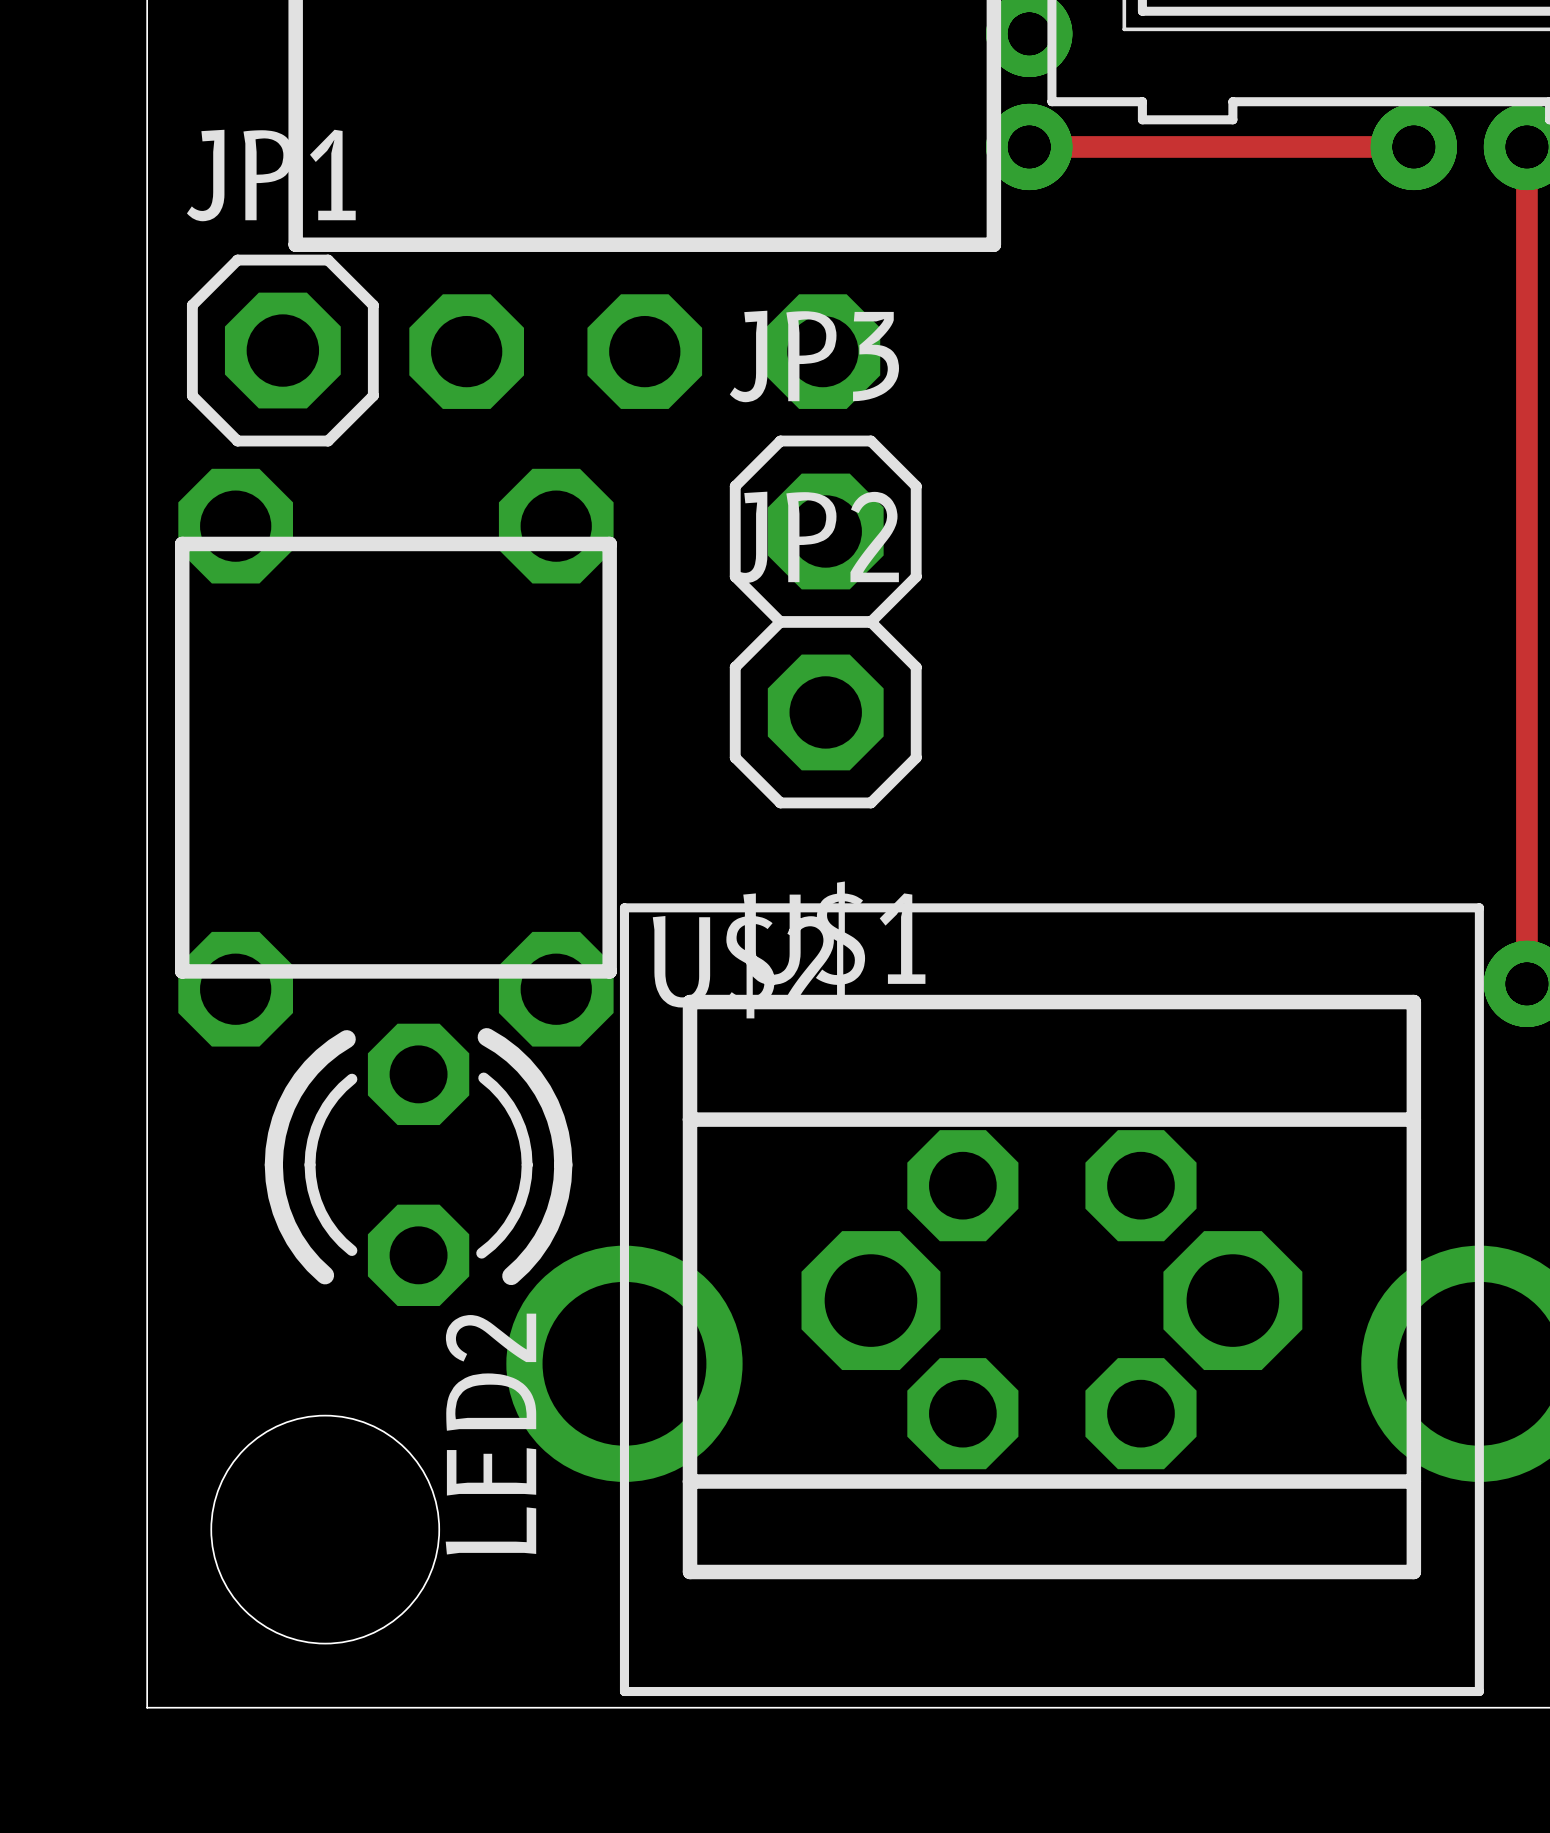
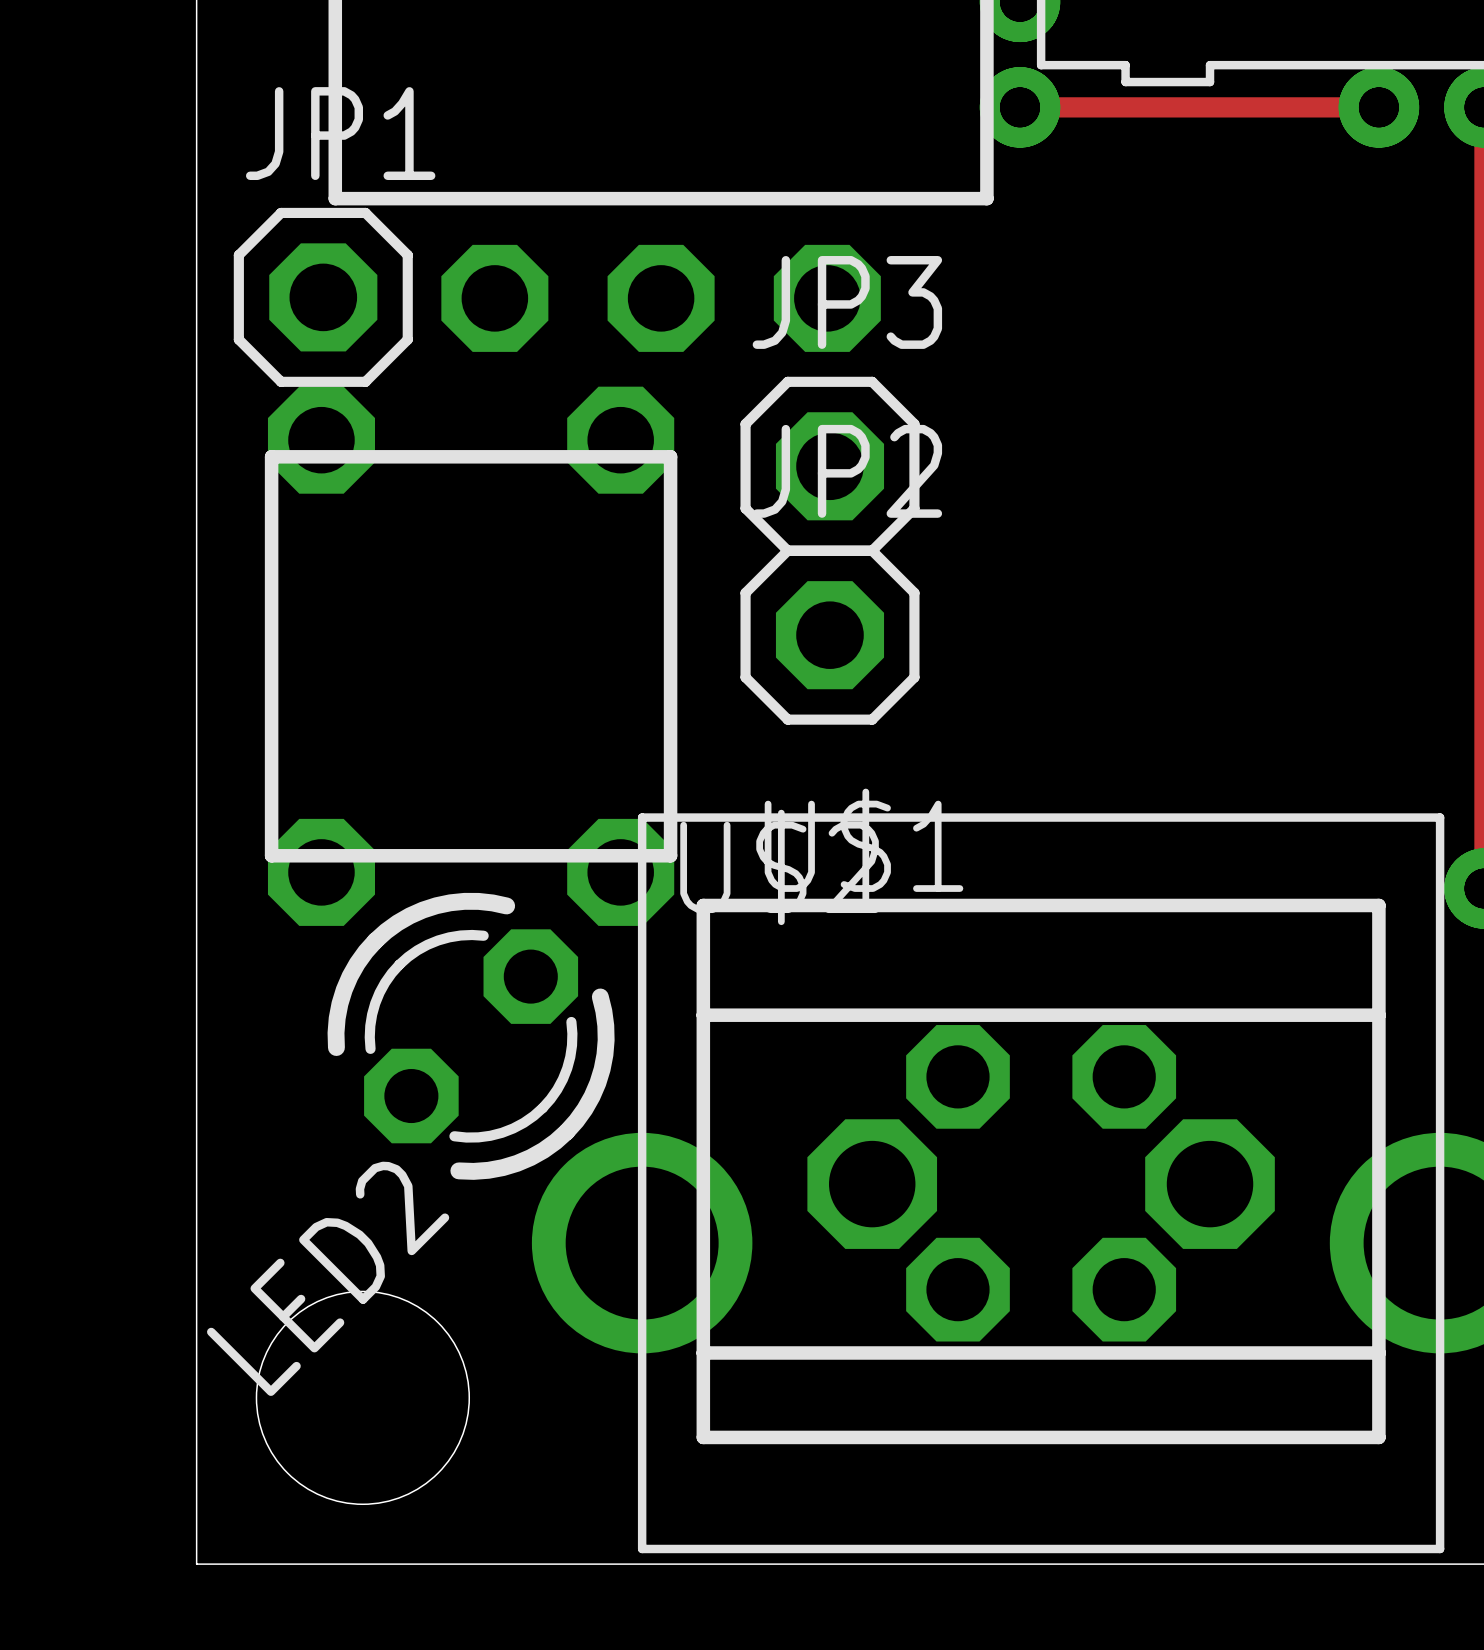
part position: (395, 757) -> (471, 656)
LED2 rotation: 0° (418, 1164) -> 45° clockwise (471, 1036)

